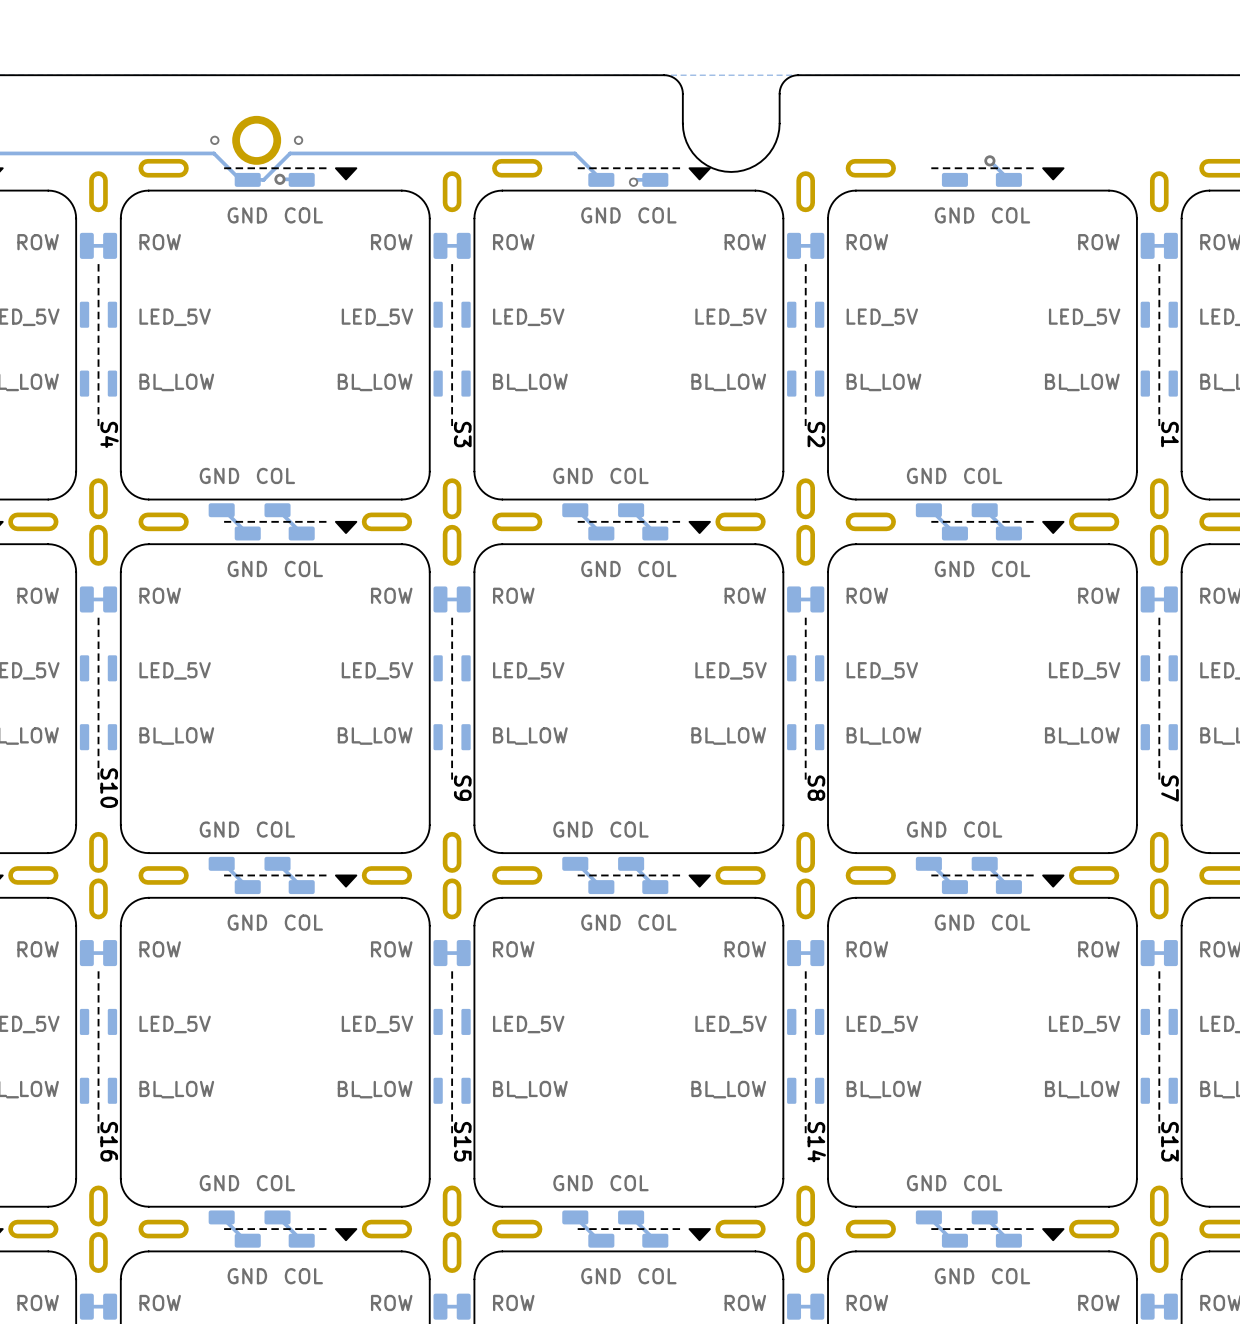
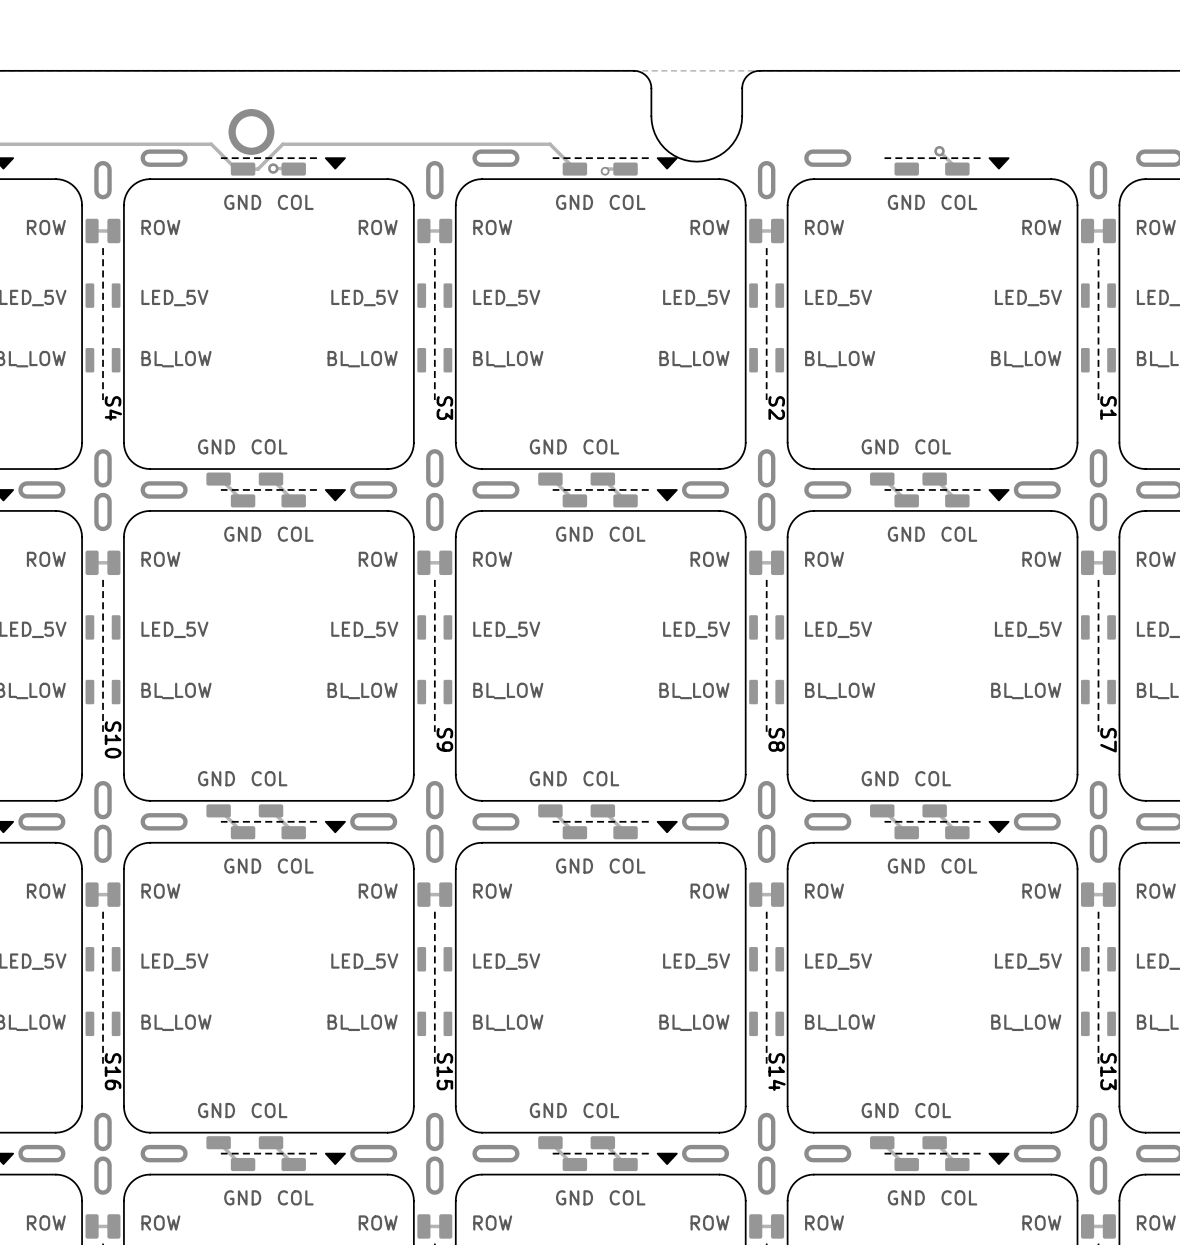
via: (214, 140) -> none
via: (298, 140) -> none

